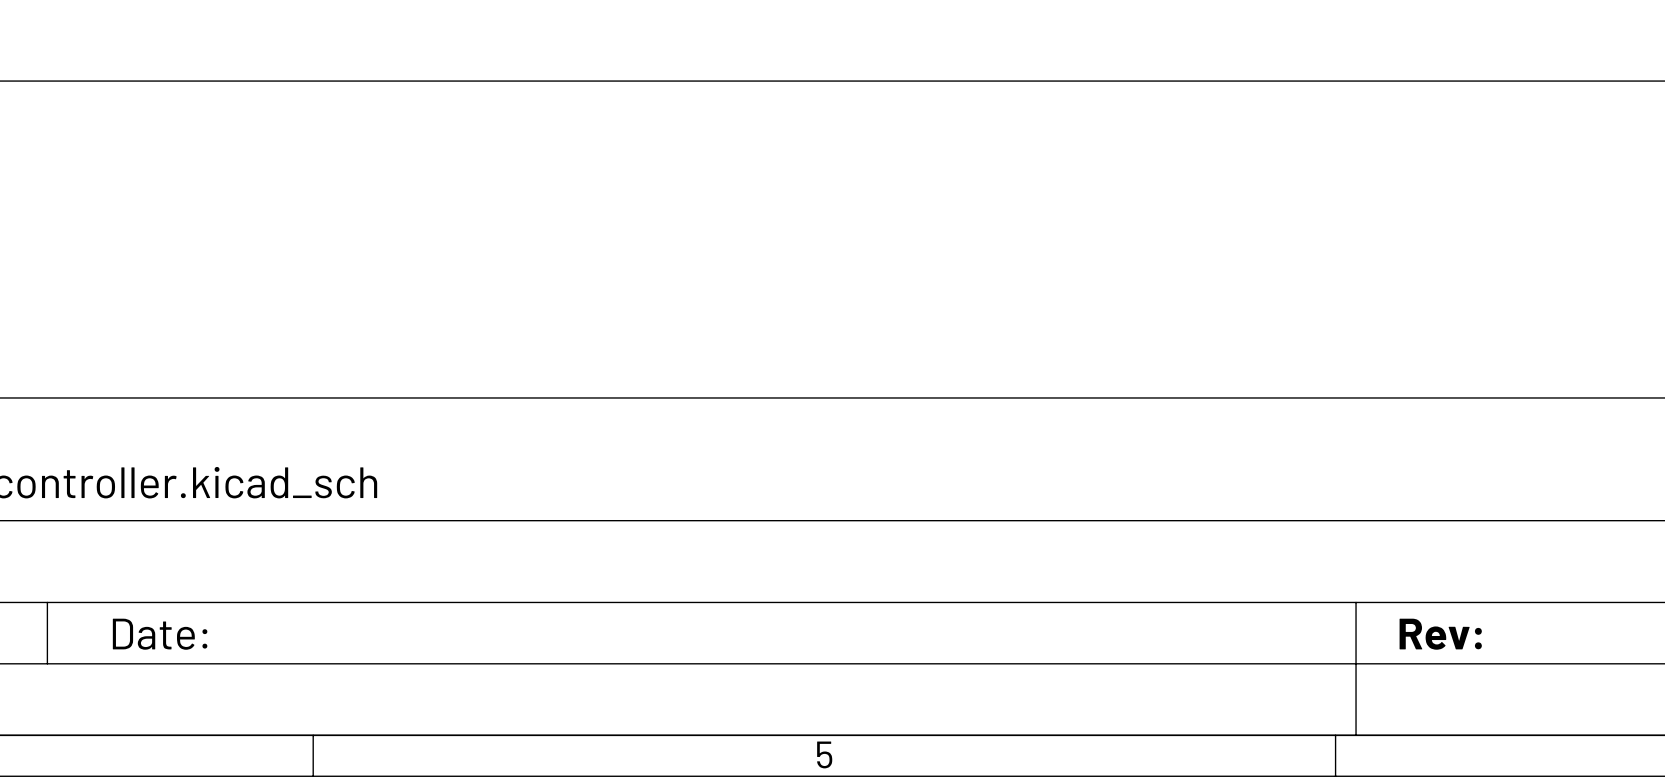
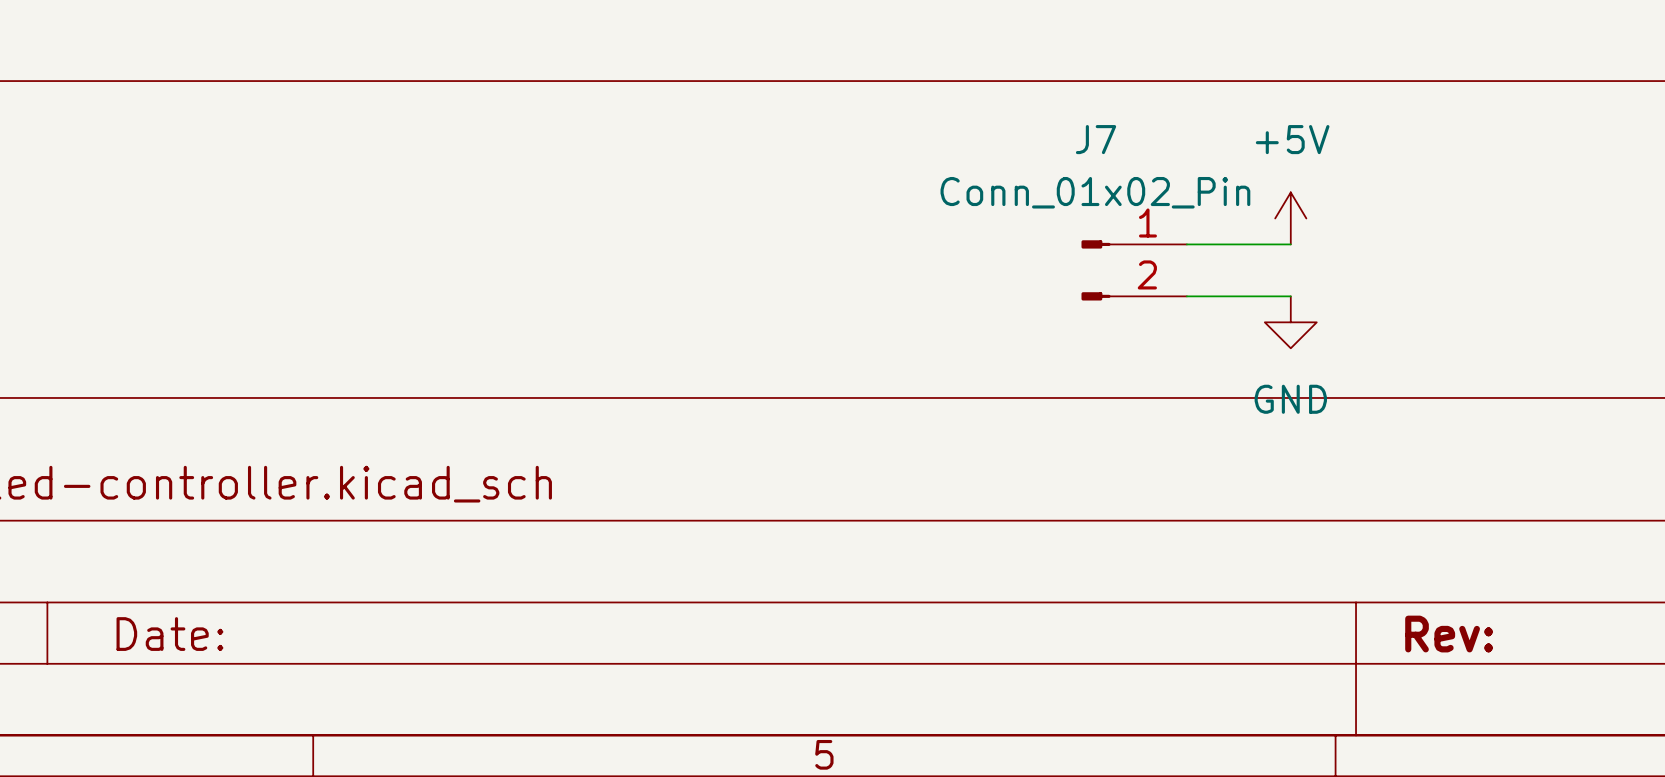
power symbol: none -> +5V (1290, 218)
wire: none -> (1186, 244) (1290, 244)
J7: none -> Conn_01x02_Pin (1134, 270)
wire: none -> (1186, 296) (1290, 296)
power symbol: none -> GND (1290, 322)

